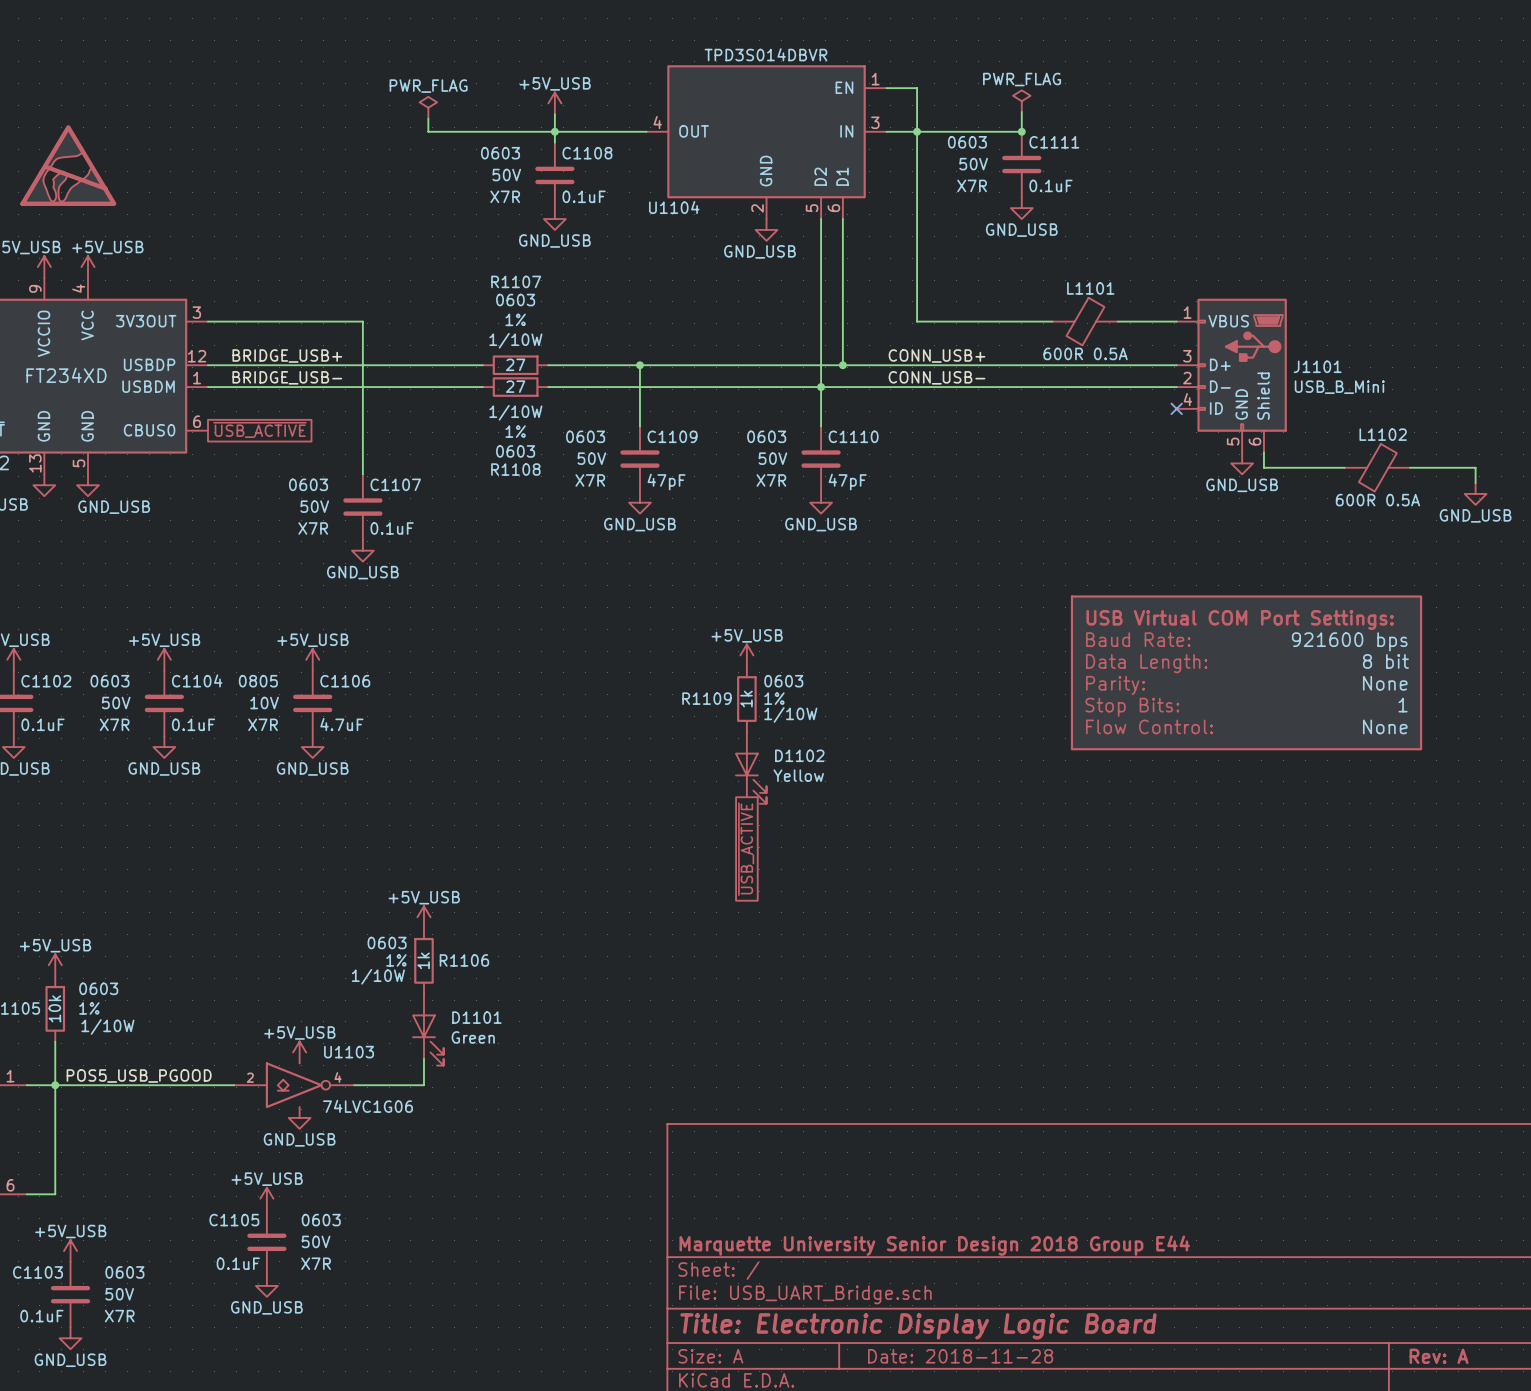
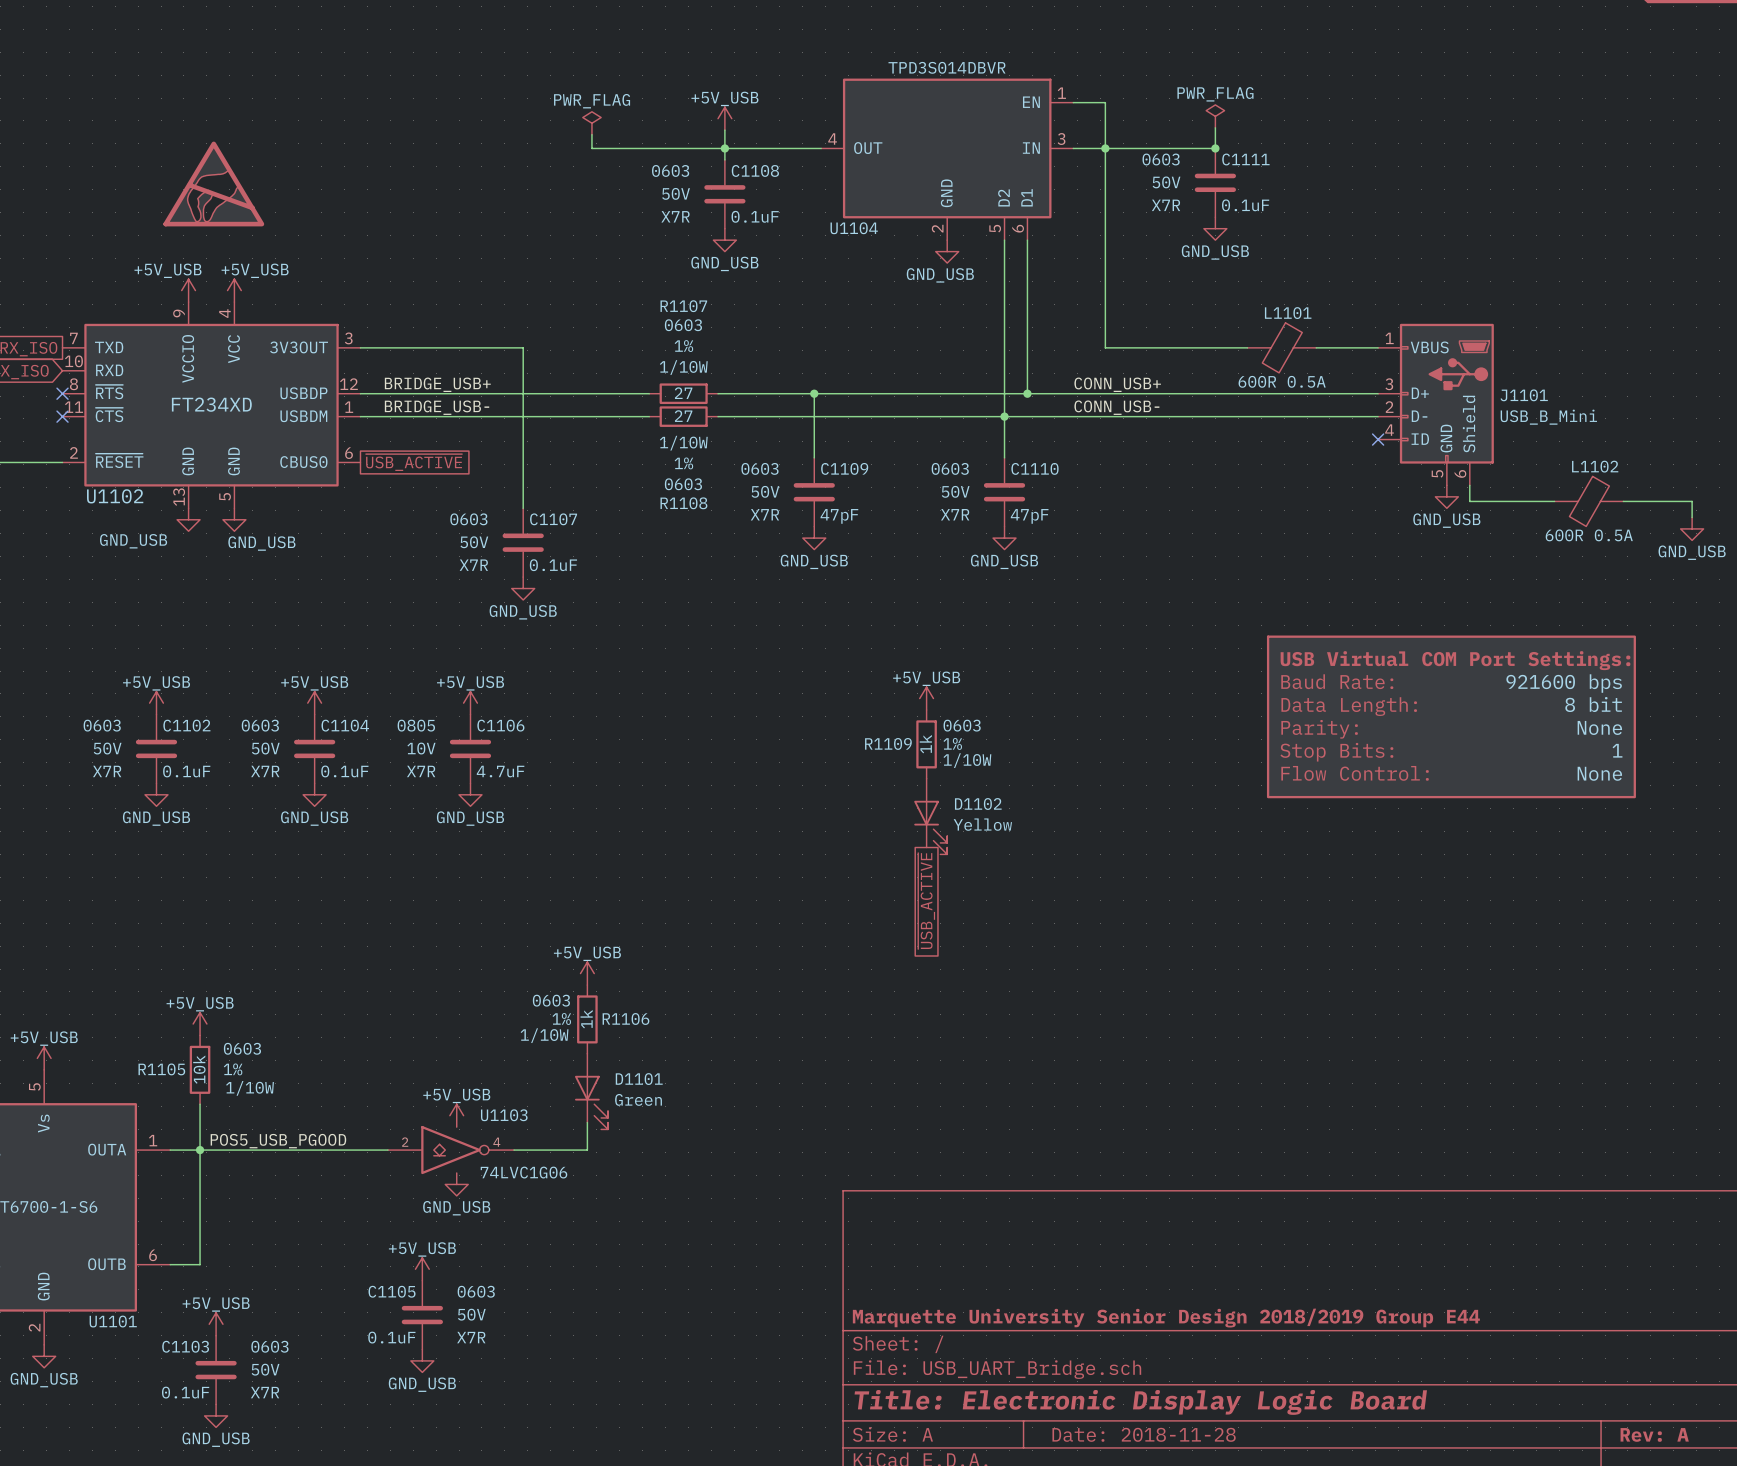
title block: Marquette University Senior Design 2018 Group E44 (934, 1245) -> Marquette University Senior Design 2018/2019 Group E44 (1166, 1318)

